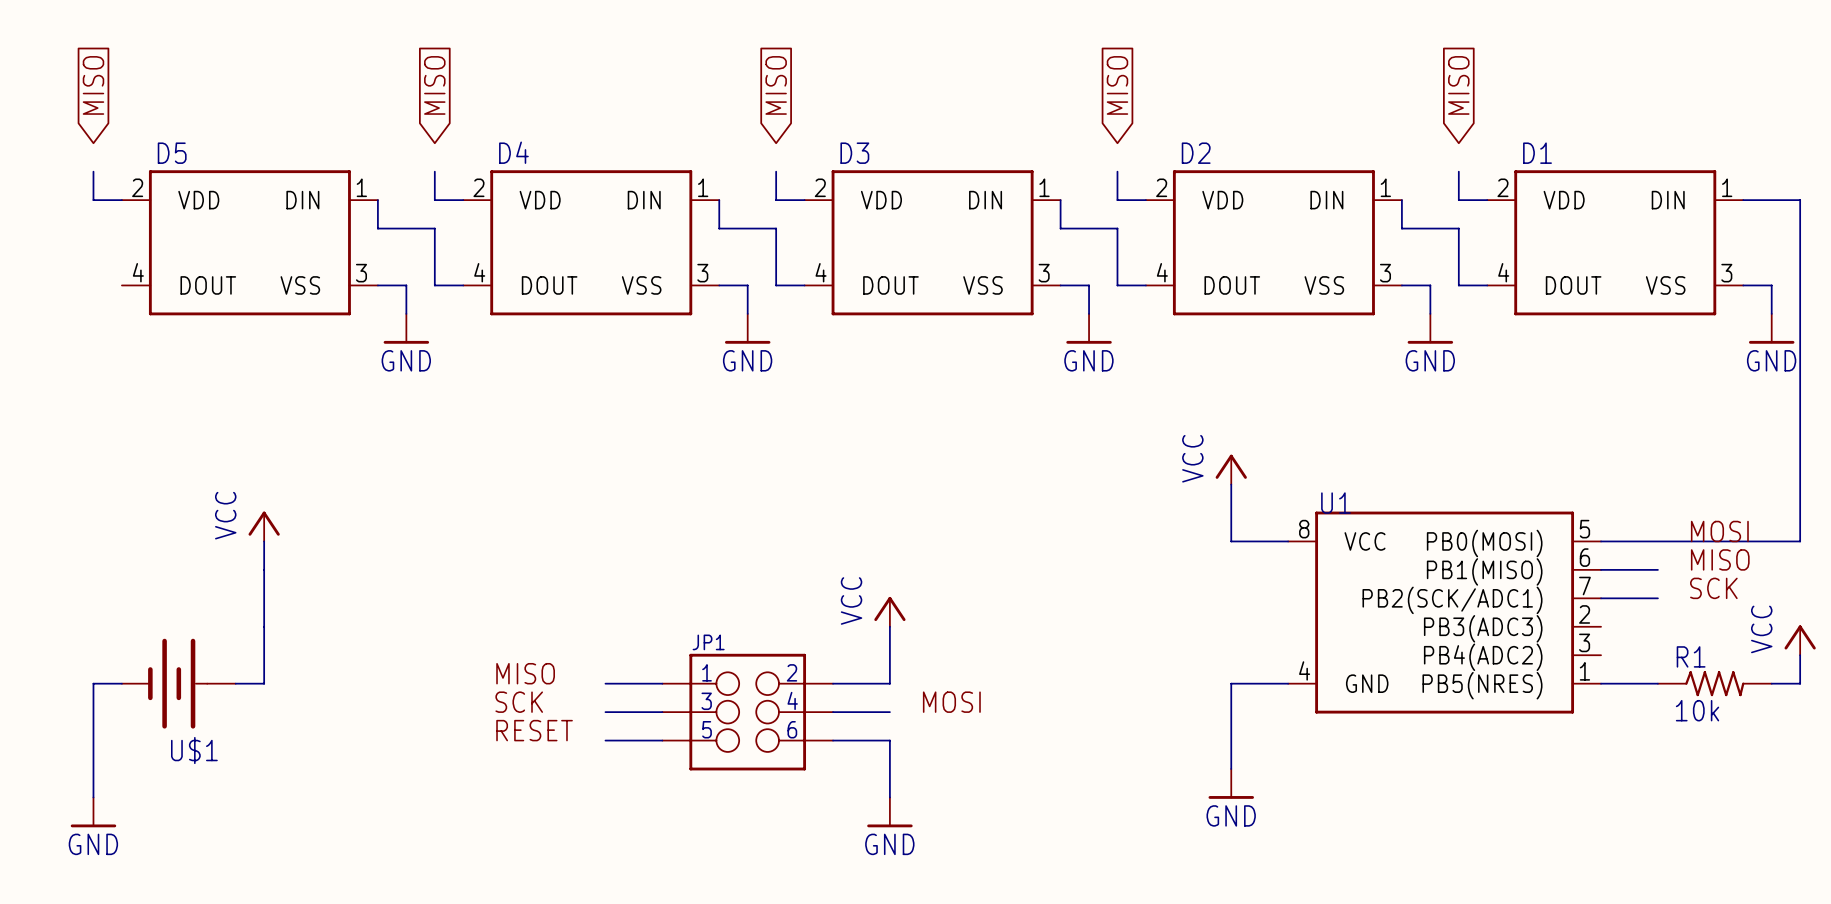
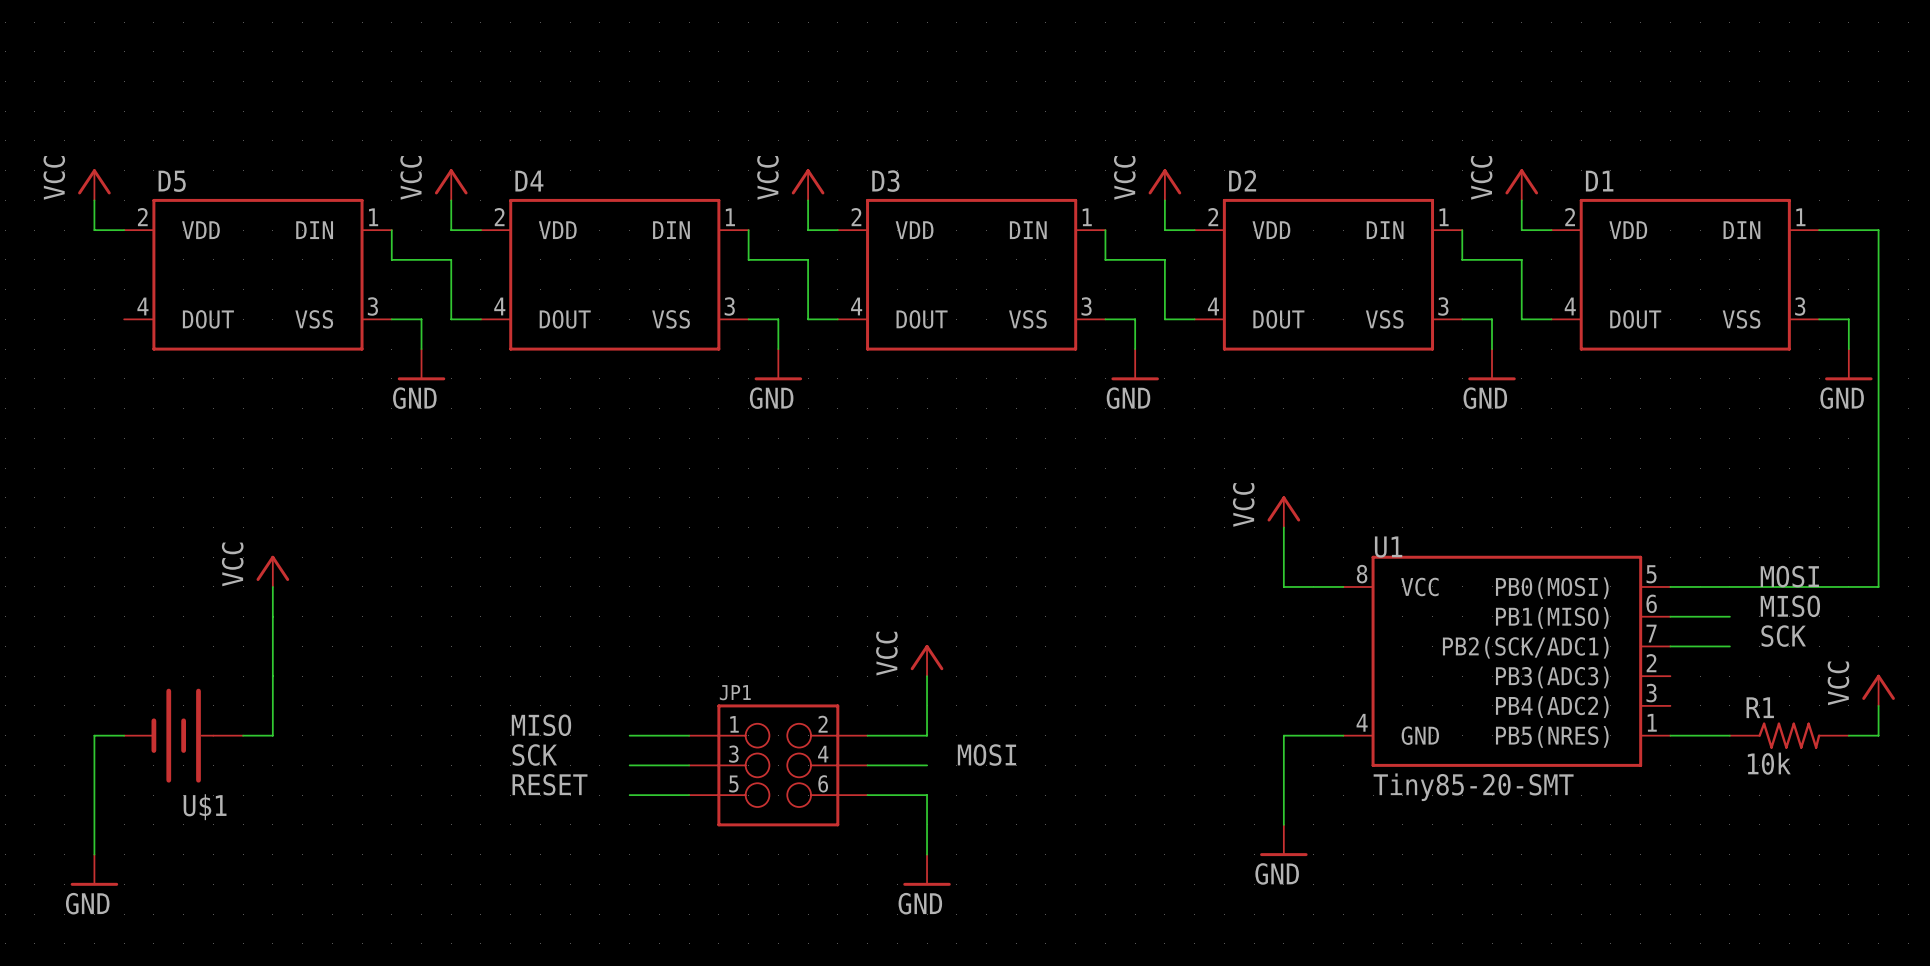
global label: MISO (93, 85) -> none
global label: MISO (434, 85) -> none
global label: MISO (776, 85) -> none
global label: MISO (1117, 85) -> none
global label: MISO (1458, 85) -> none
power symbol: none -> VCC (94, 184)
power symbol: none -> VCC (451, 184)
power symbol: none -> VCC (808, 184)
power symbol: none -> VCC (1164, 184)
power symbol: none -> VCC (1521, 184)
U1 value: none -> Tiny85-20-SMT (1473, 787)

